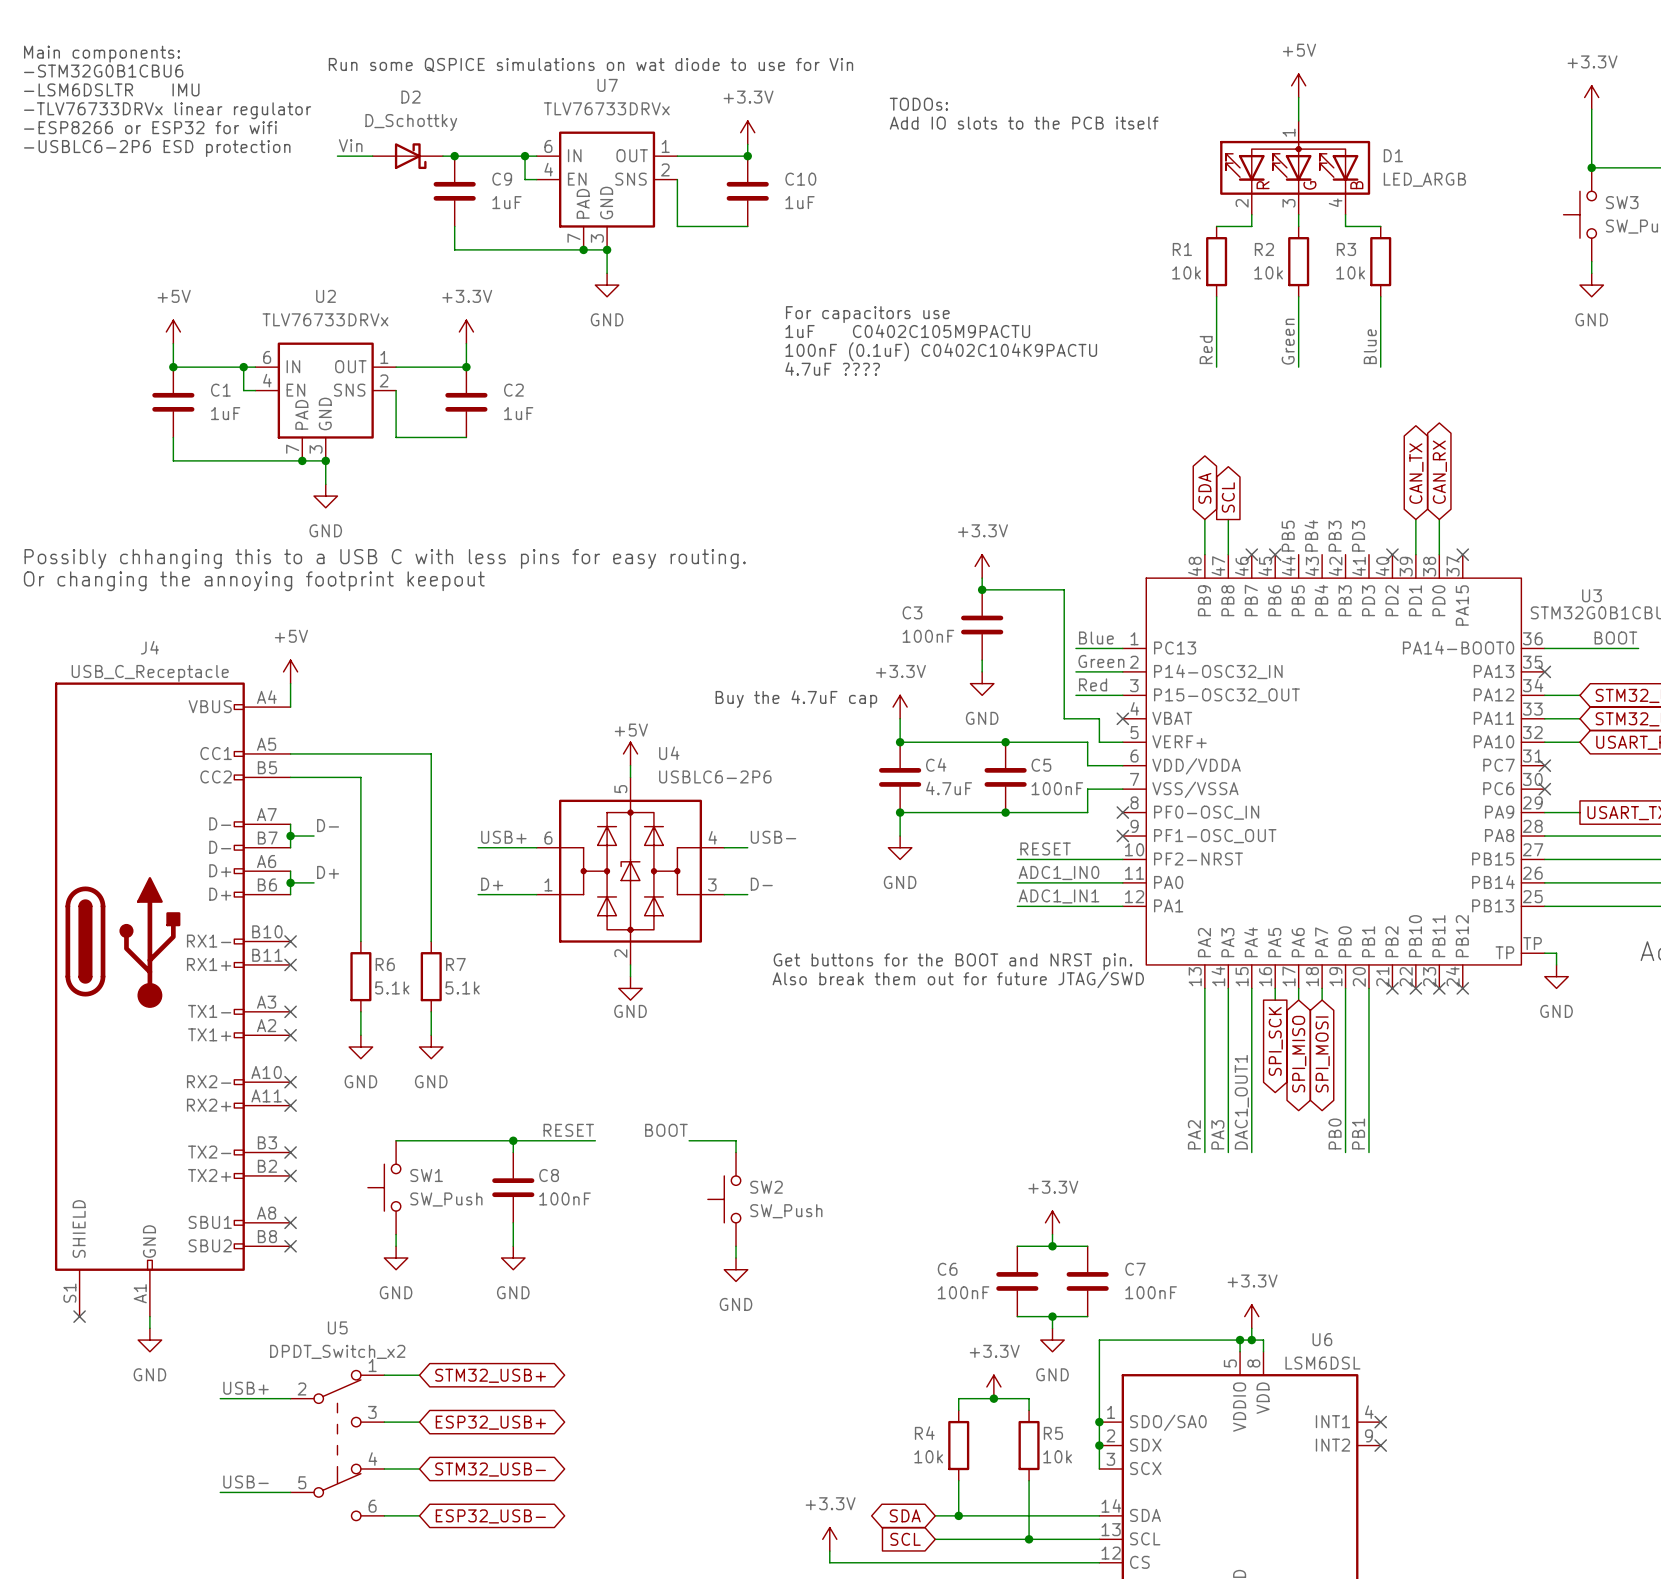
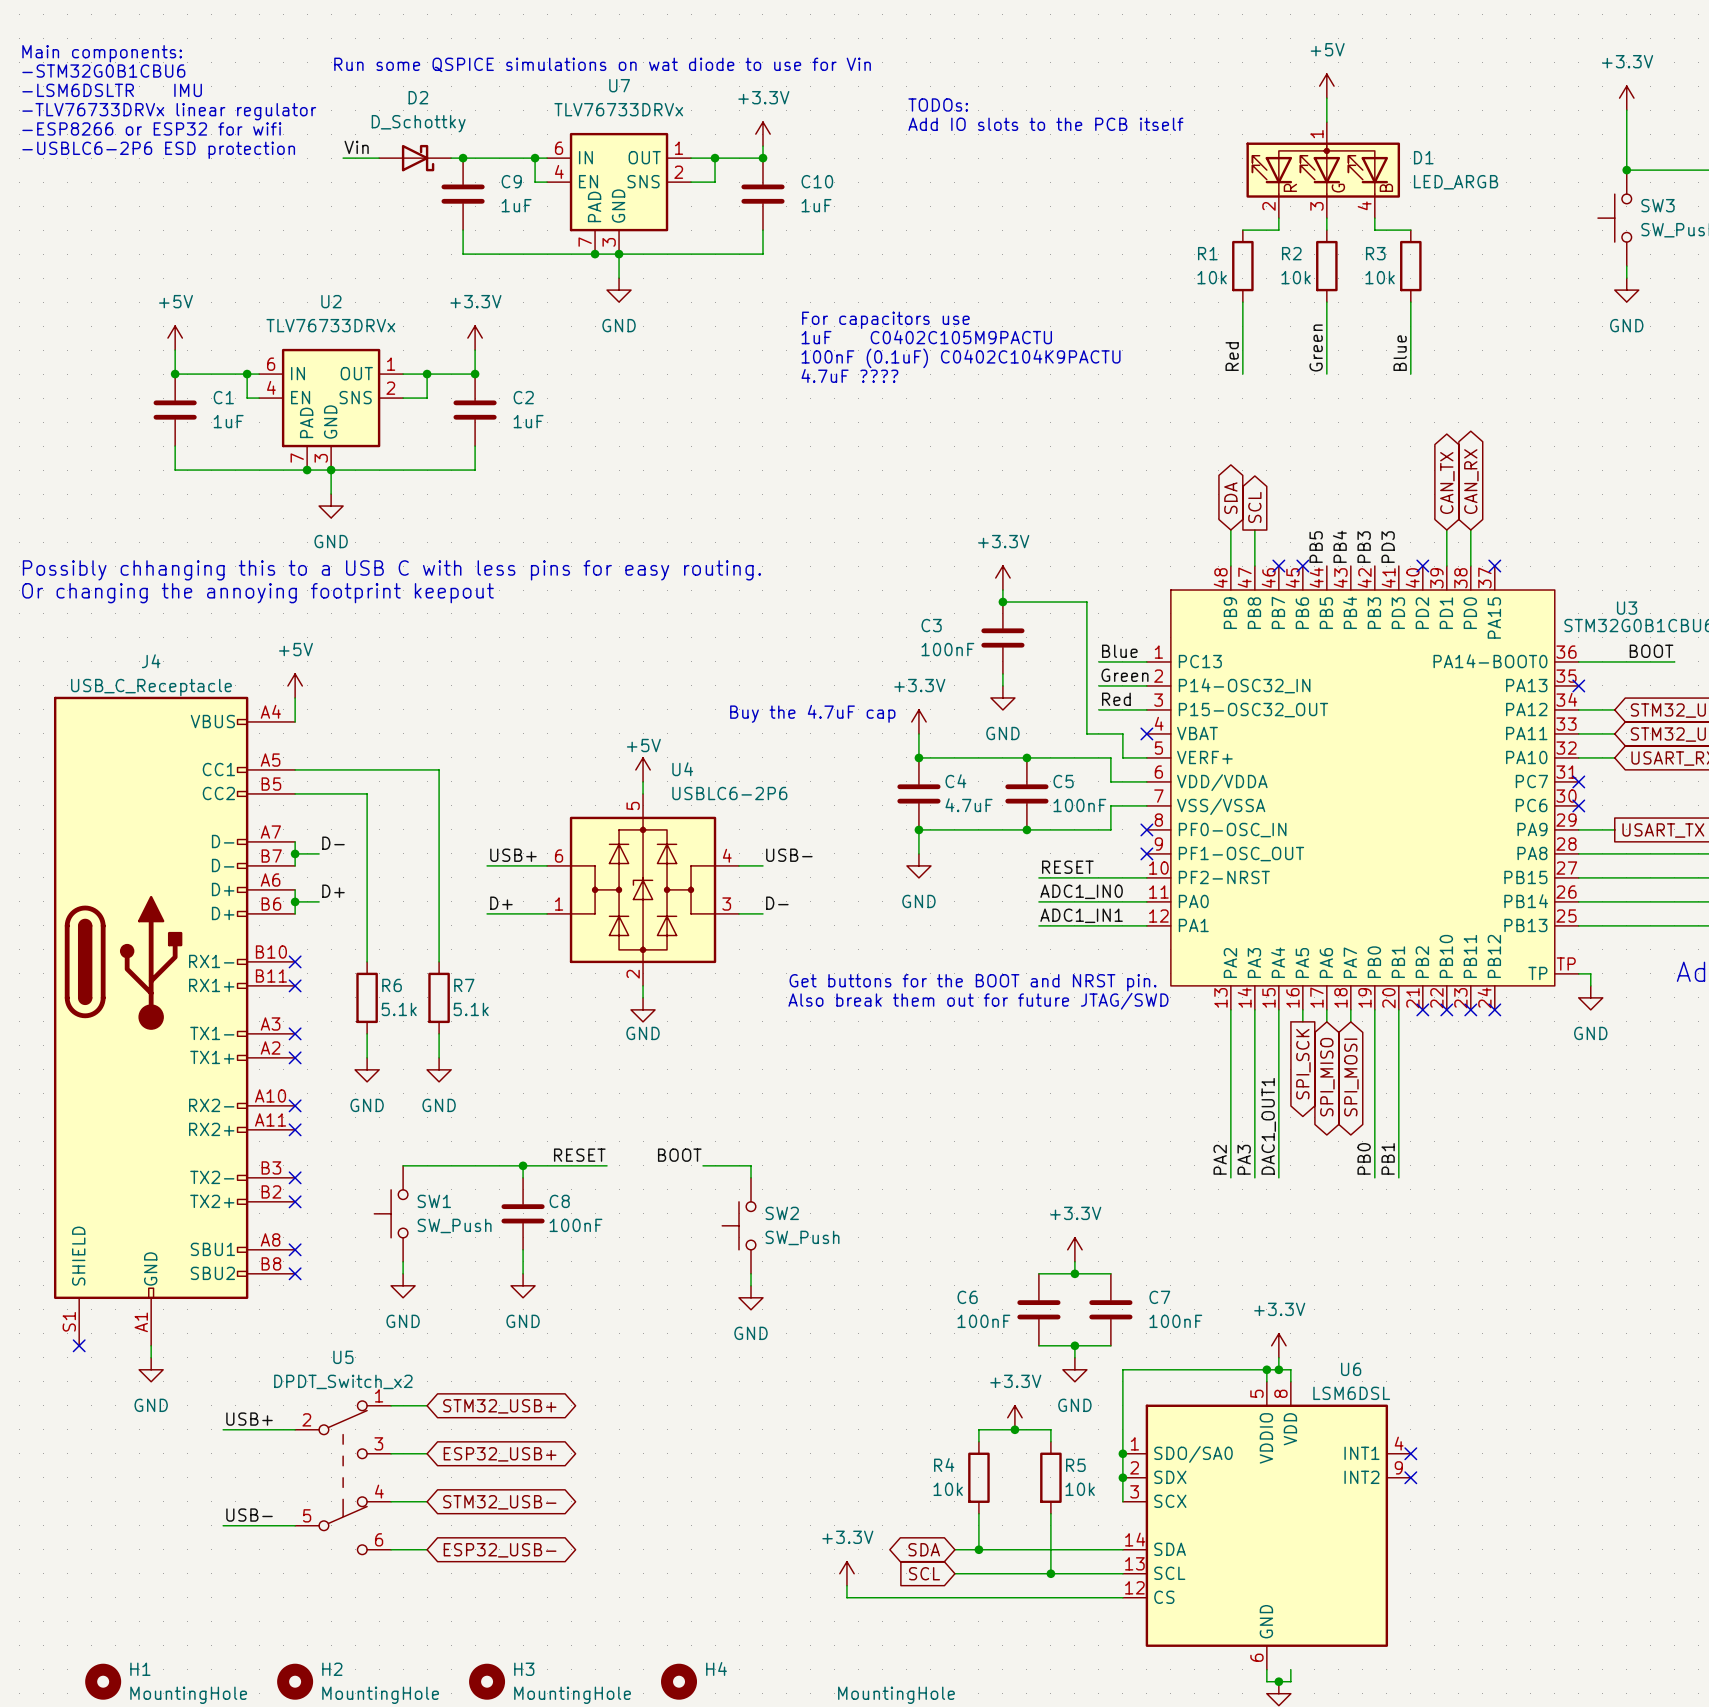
junction: none -> (715, 158)
wire: (677, 179) (677, 226) (747, 226) -> (691, 182) (715, 182) (715, 158)
wire: none -> (762, 230) (762, 254) (619, 254)
junction: none -> (427, 374)
wire: (396, 390) (396, 437) (466, 437) -> (403, 398) (427, 398) (427, 374)
wire: none -> (475, 446) (475, 470) (331, 470)

